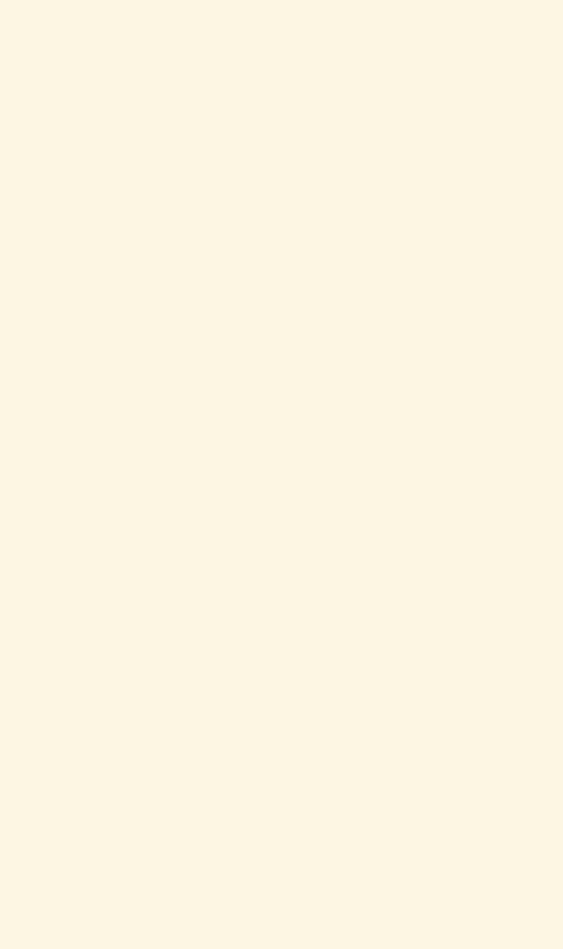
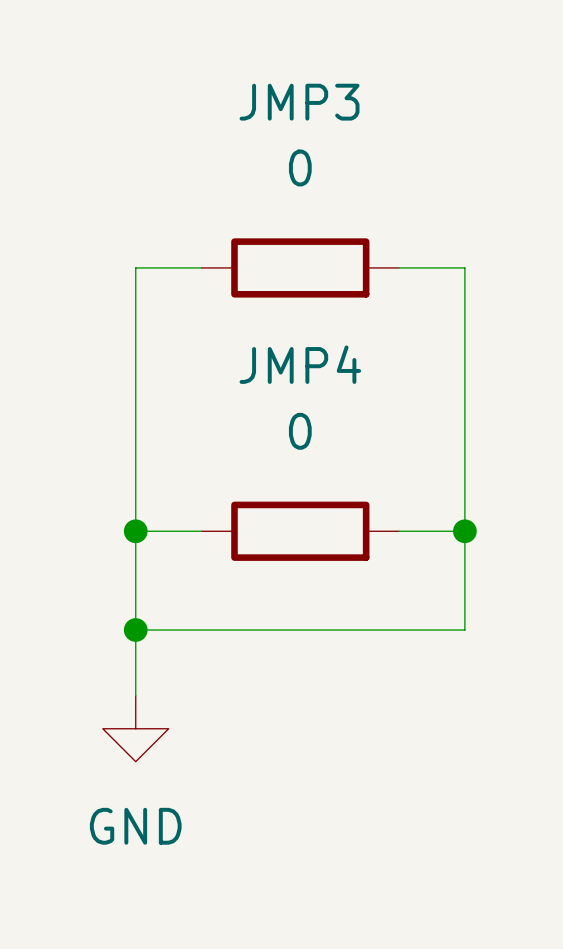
wire: none -> (201, 267) (135, 267) (135, 695)
JMP3: none -> 0 (300, 267)
wire: none -> (399, 267) (464, 267) (464, 630) (135, 630)
wire: none -> (135, 531) (201, 531)
junction: none -> (135, 531)
JMP4: none -> 0 (300, 531)
wire: none -> (399, 531) (464, 531)
junction: none -> (464, 531)
junction: none -> (135, 630)
power symbol: none -> GND (135, 728)

